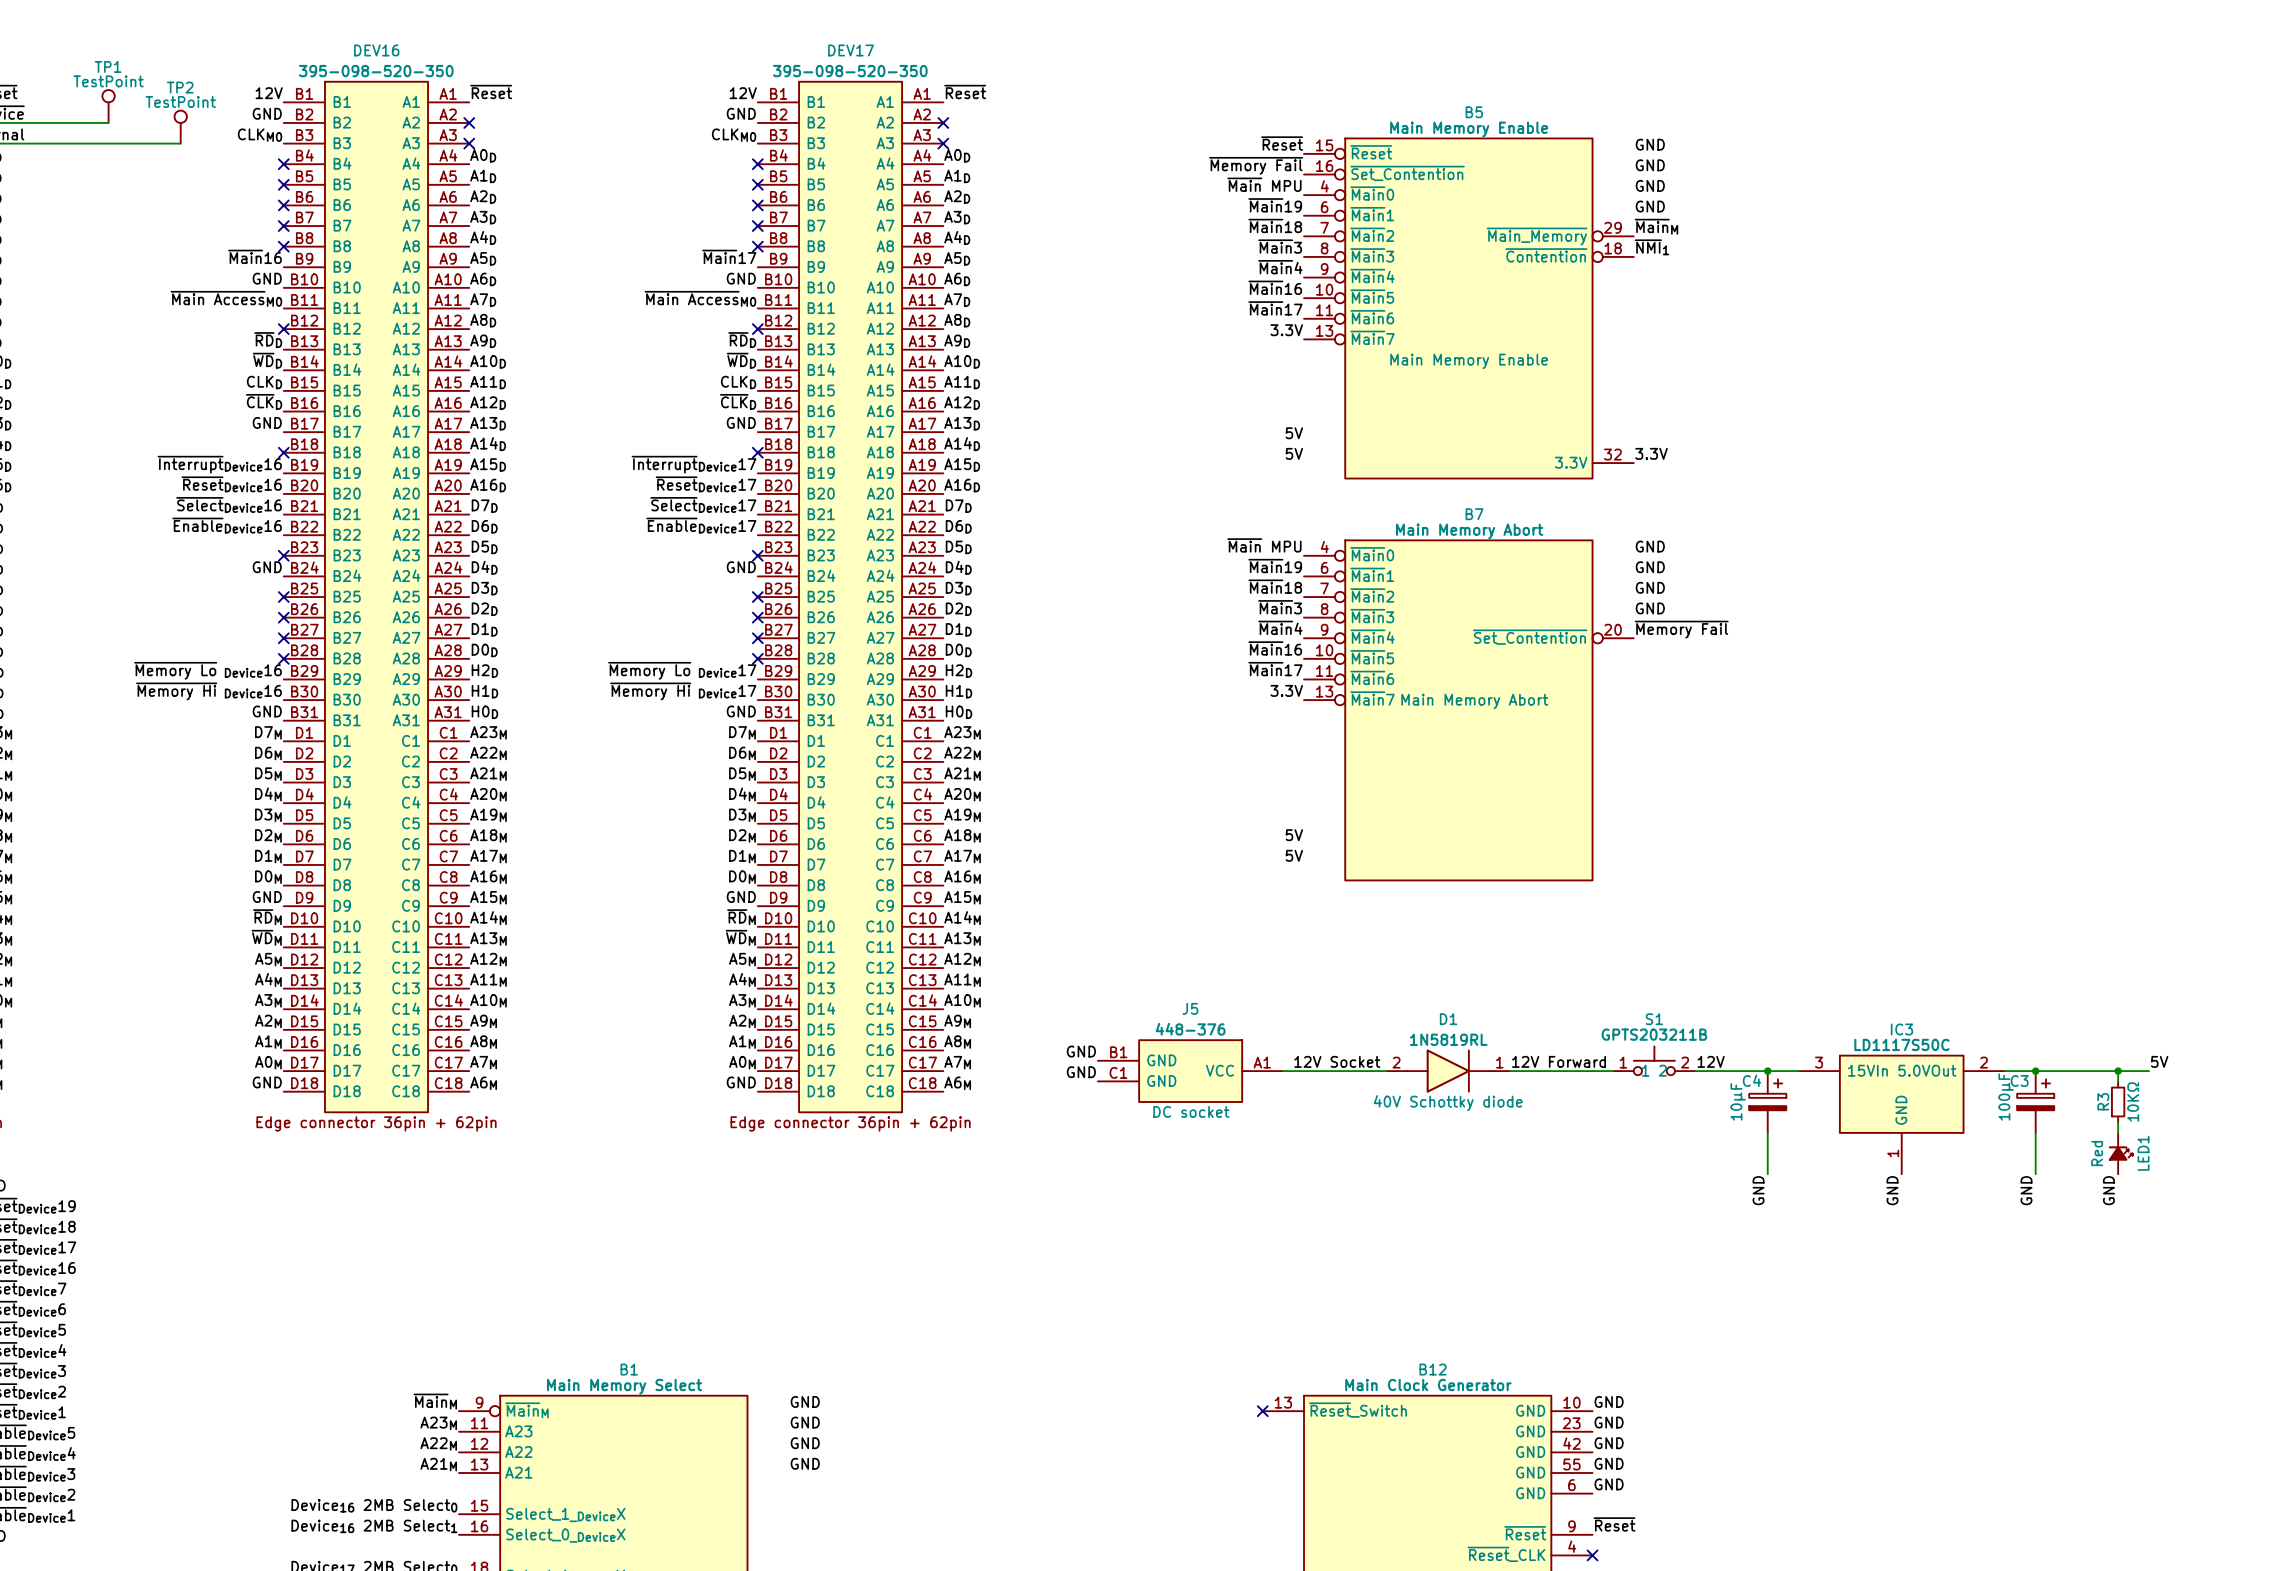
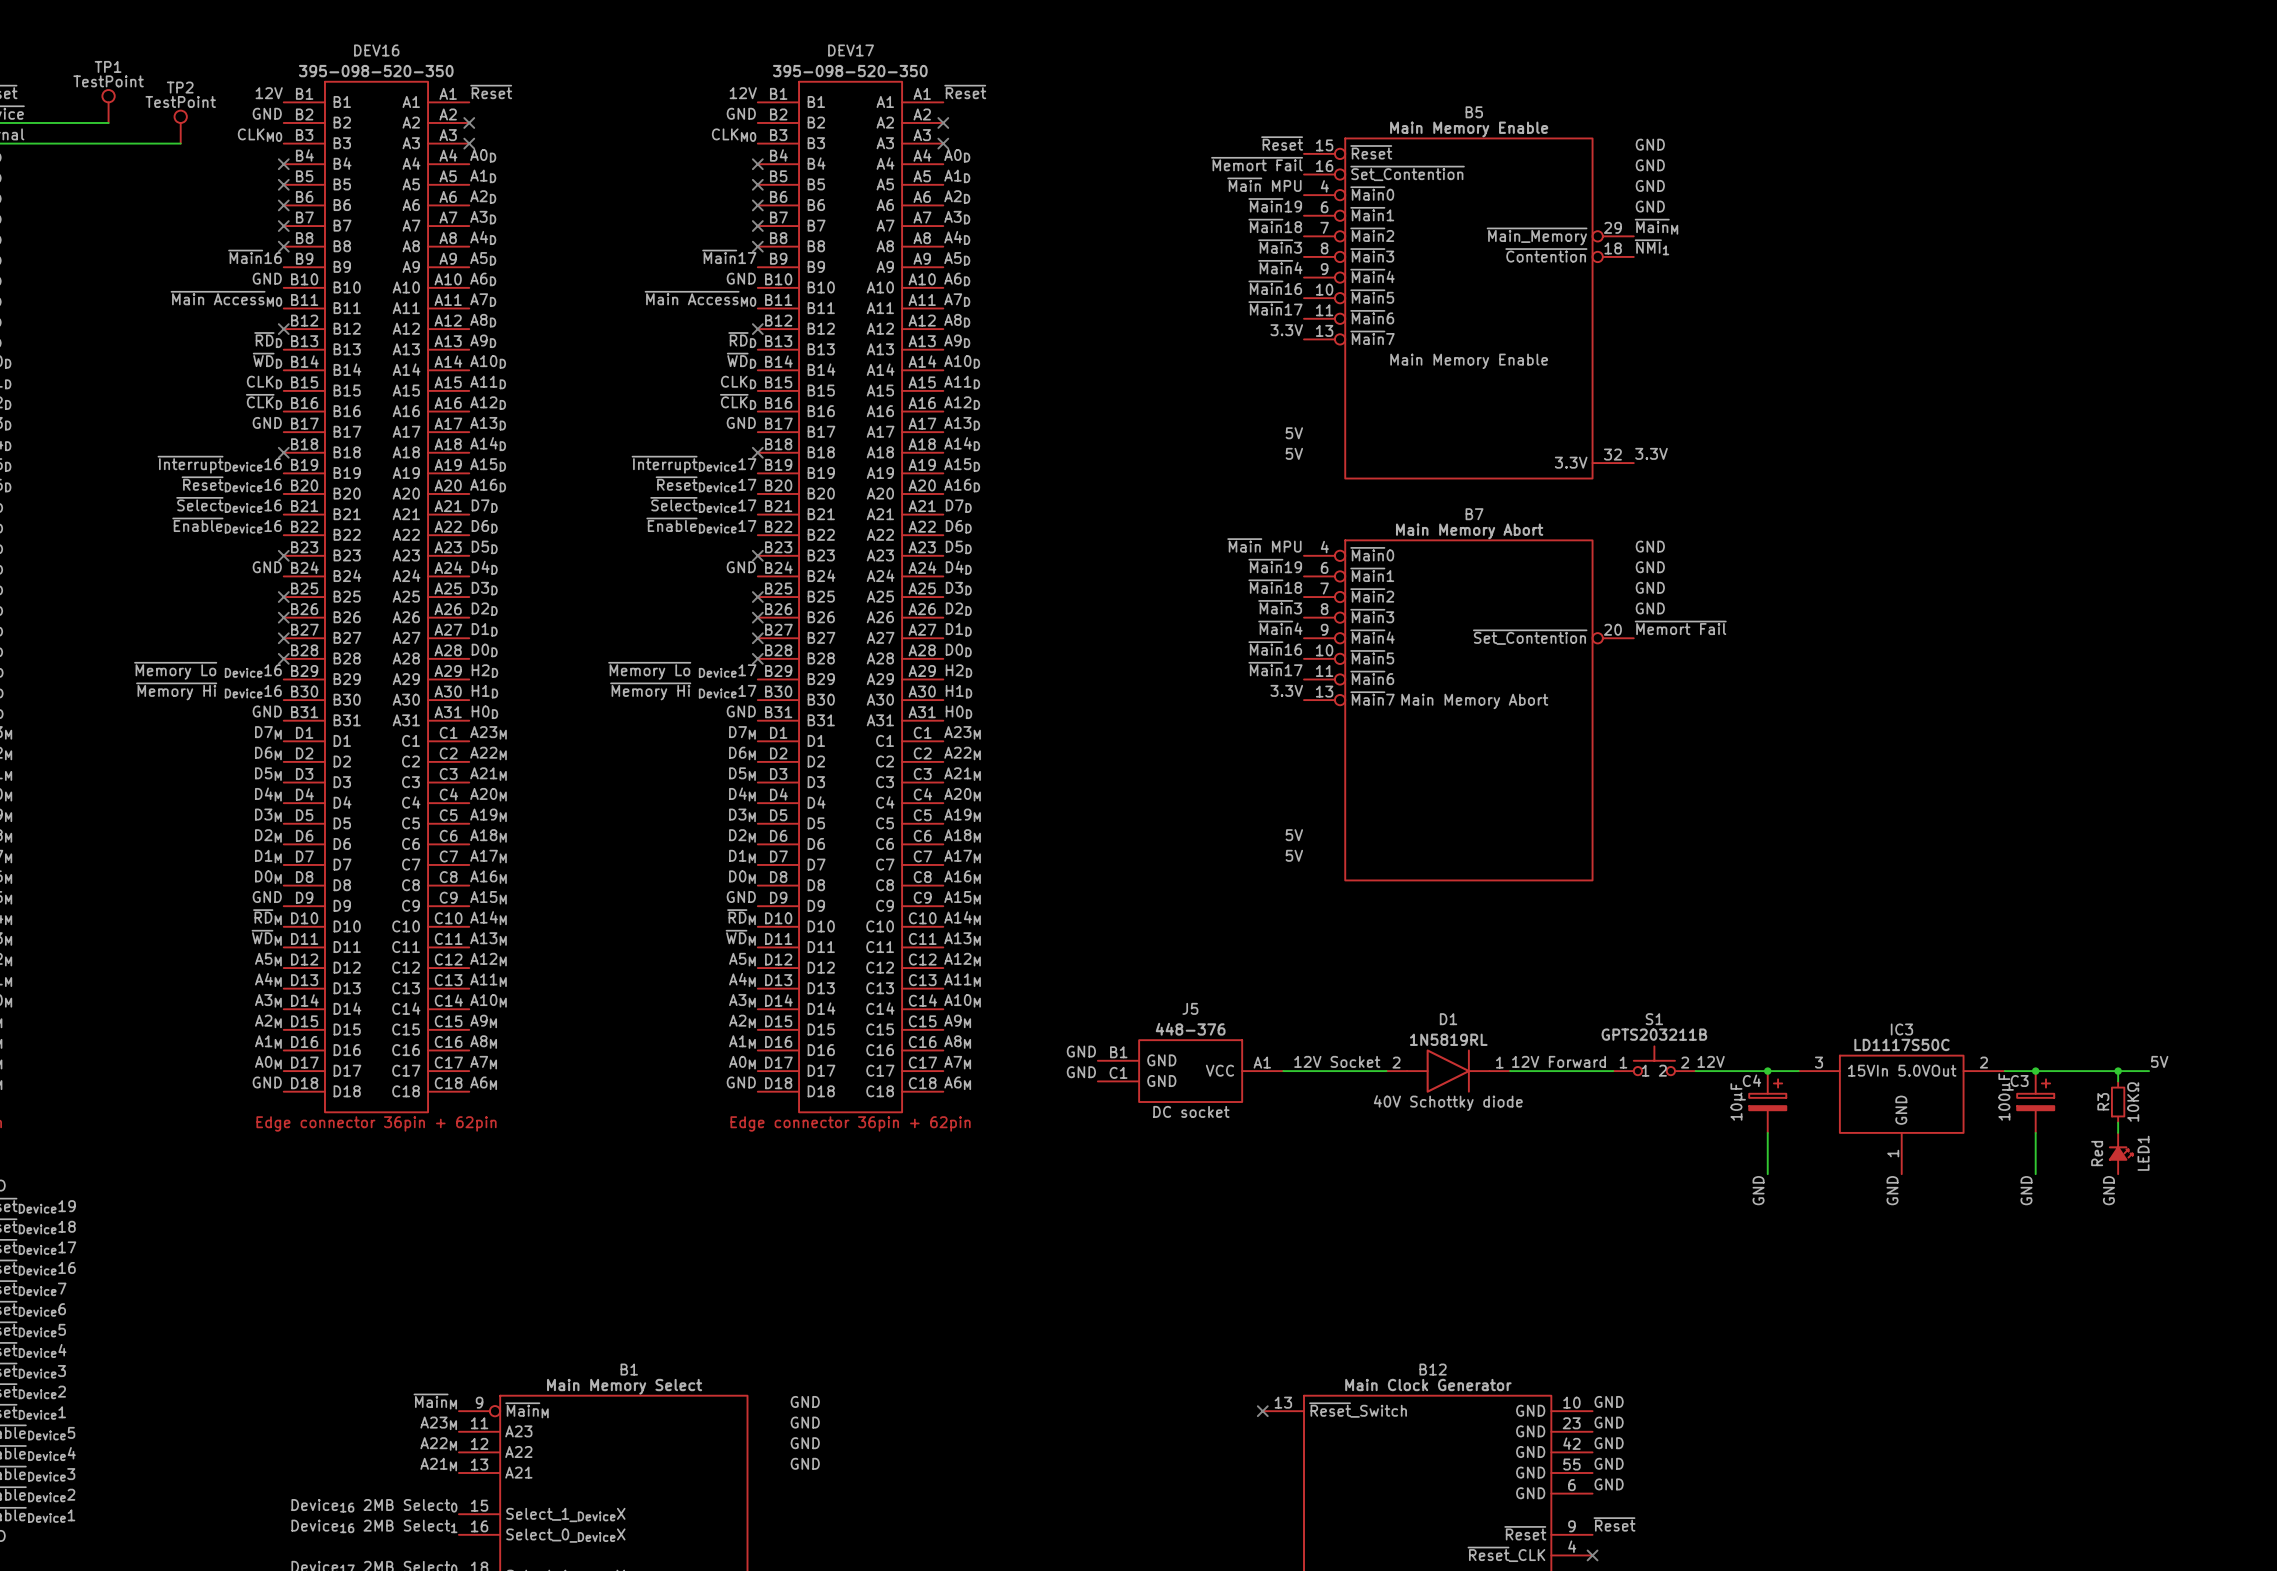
label: ~{Memory Fail} (1256, 165) -> ~{Memort Fail} (1257, 164)
label: ~{Memory Fail} (1681, 629) -> ~{Memort Fail} (1680, 627)

